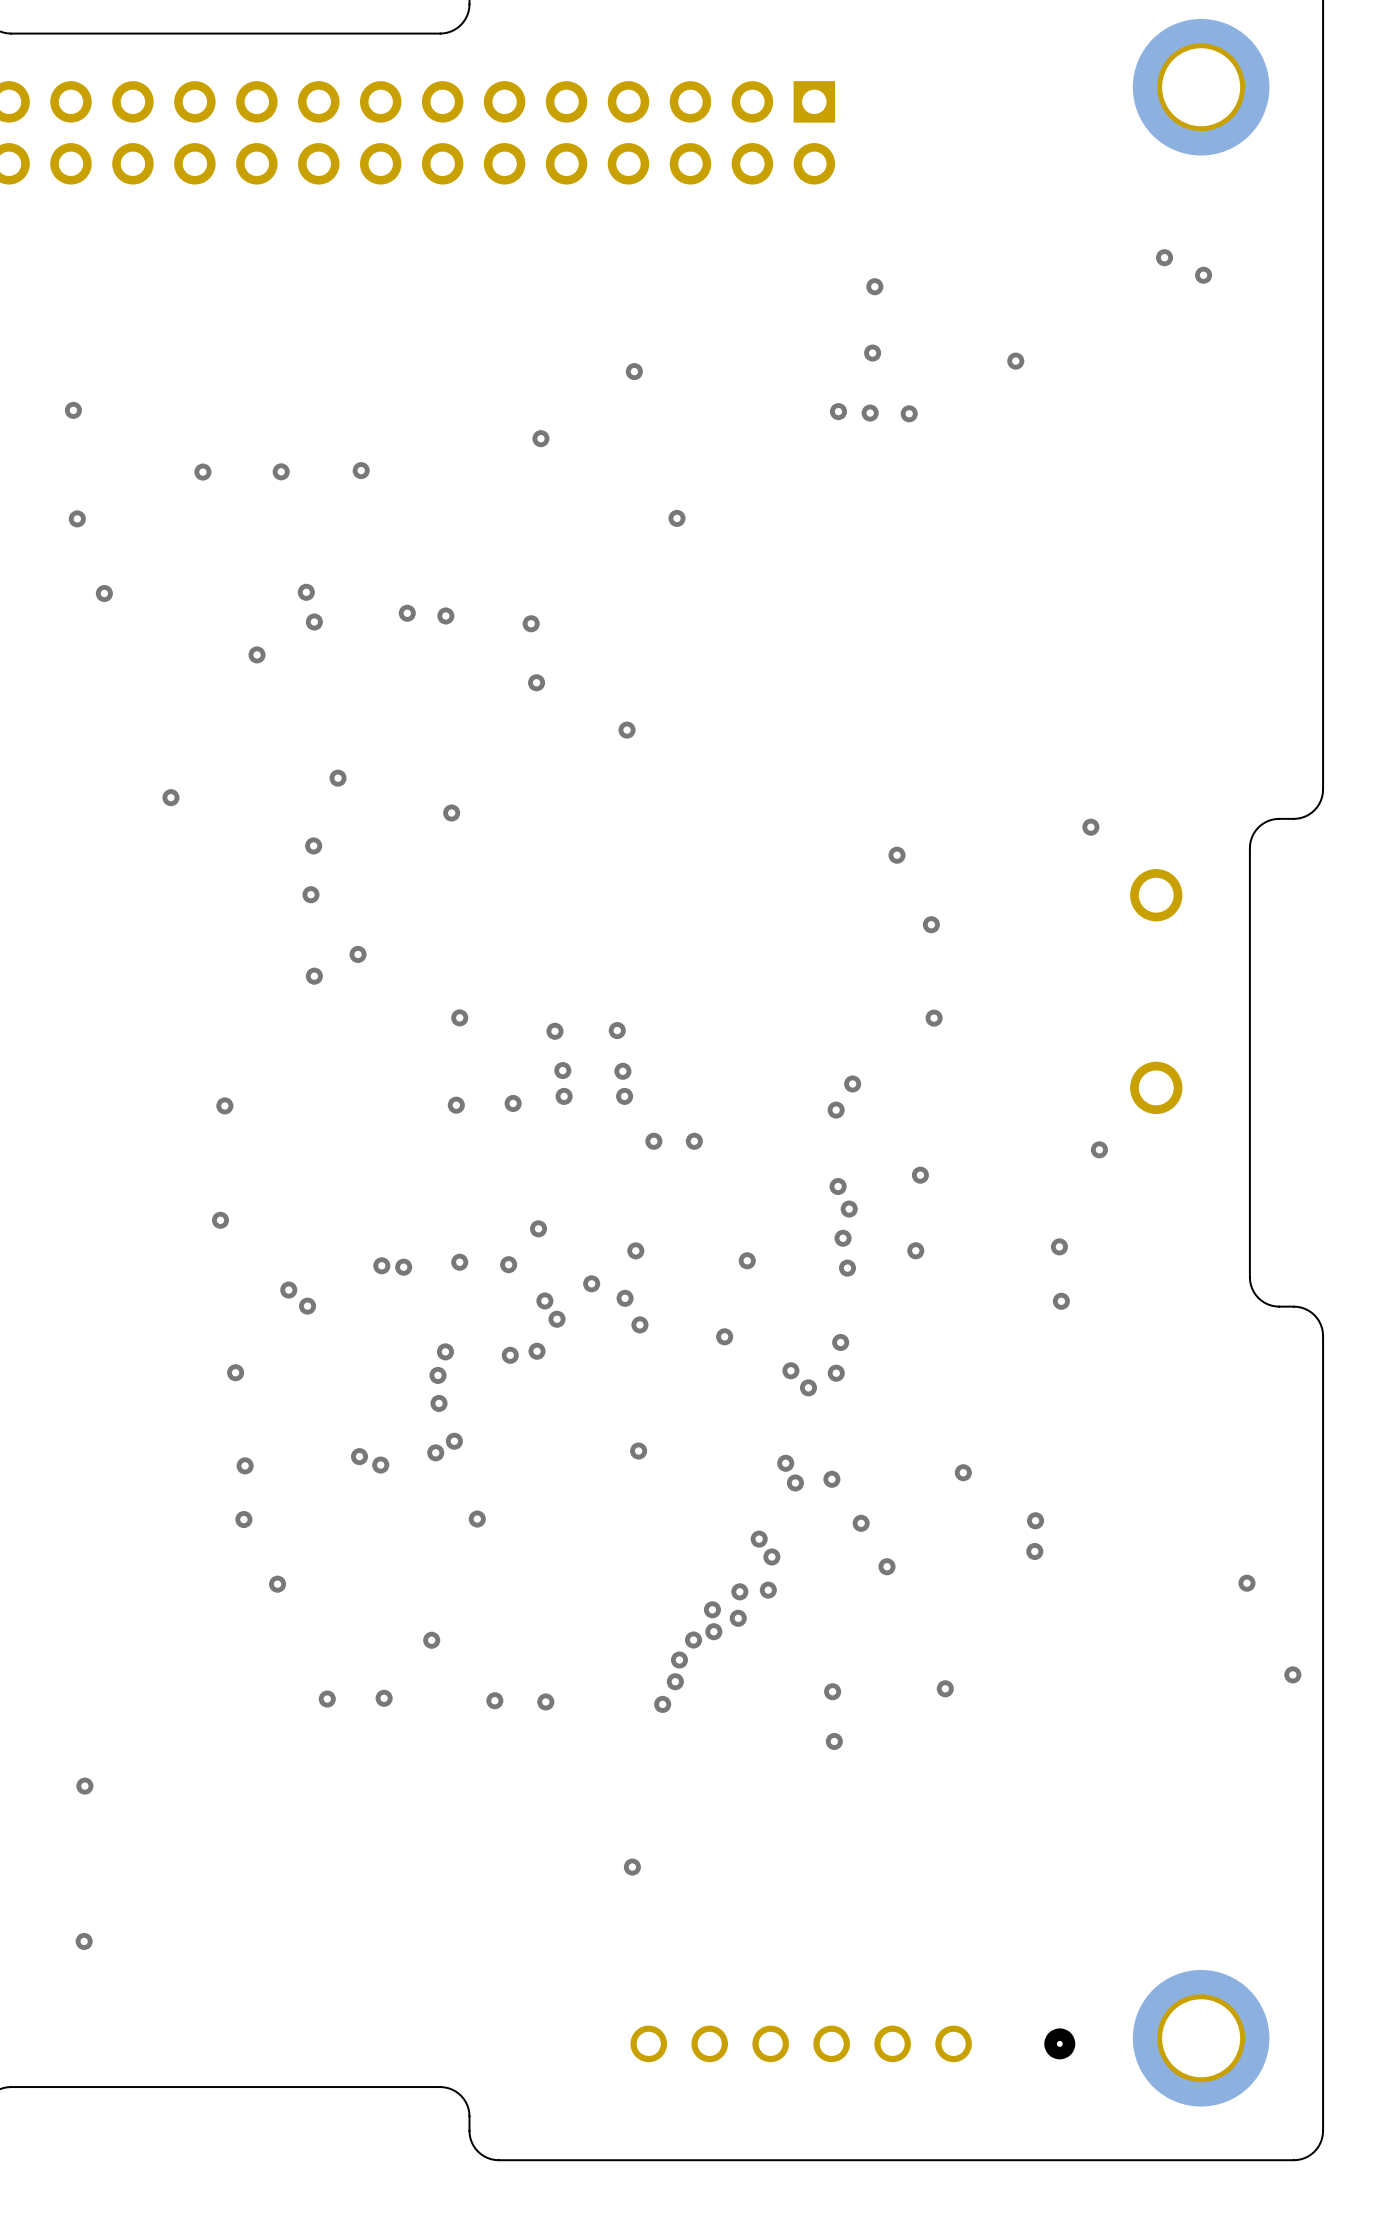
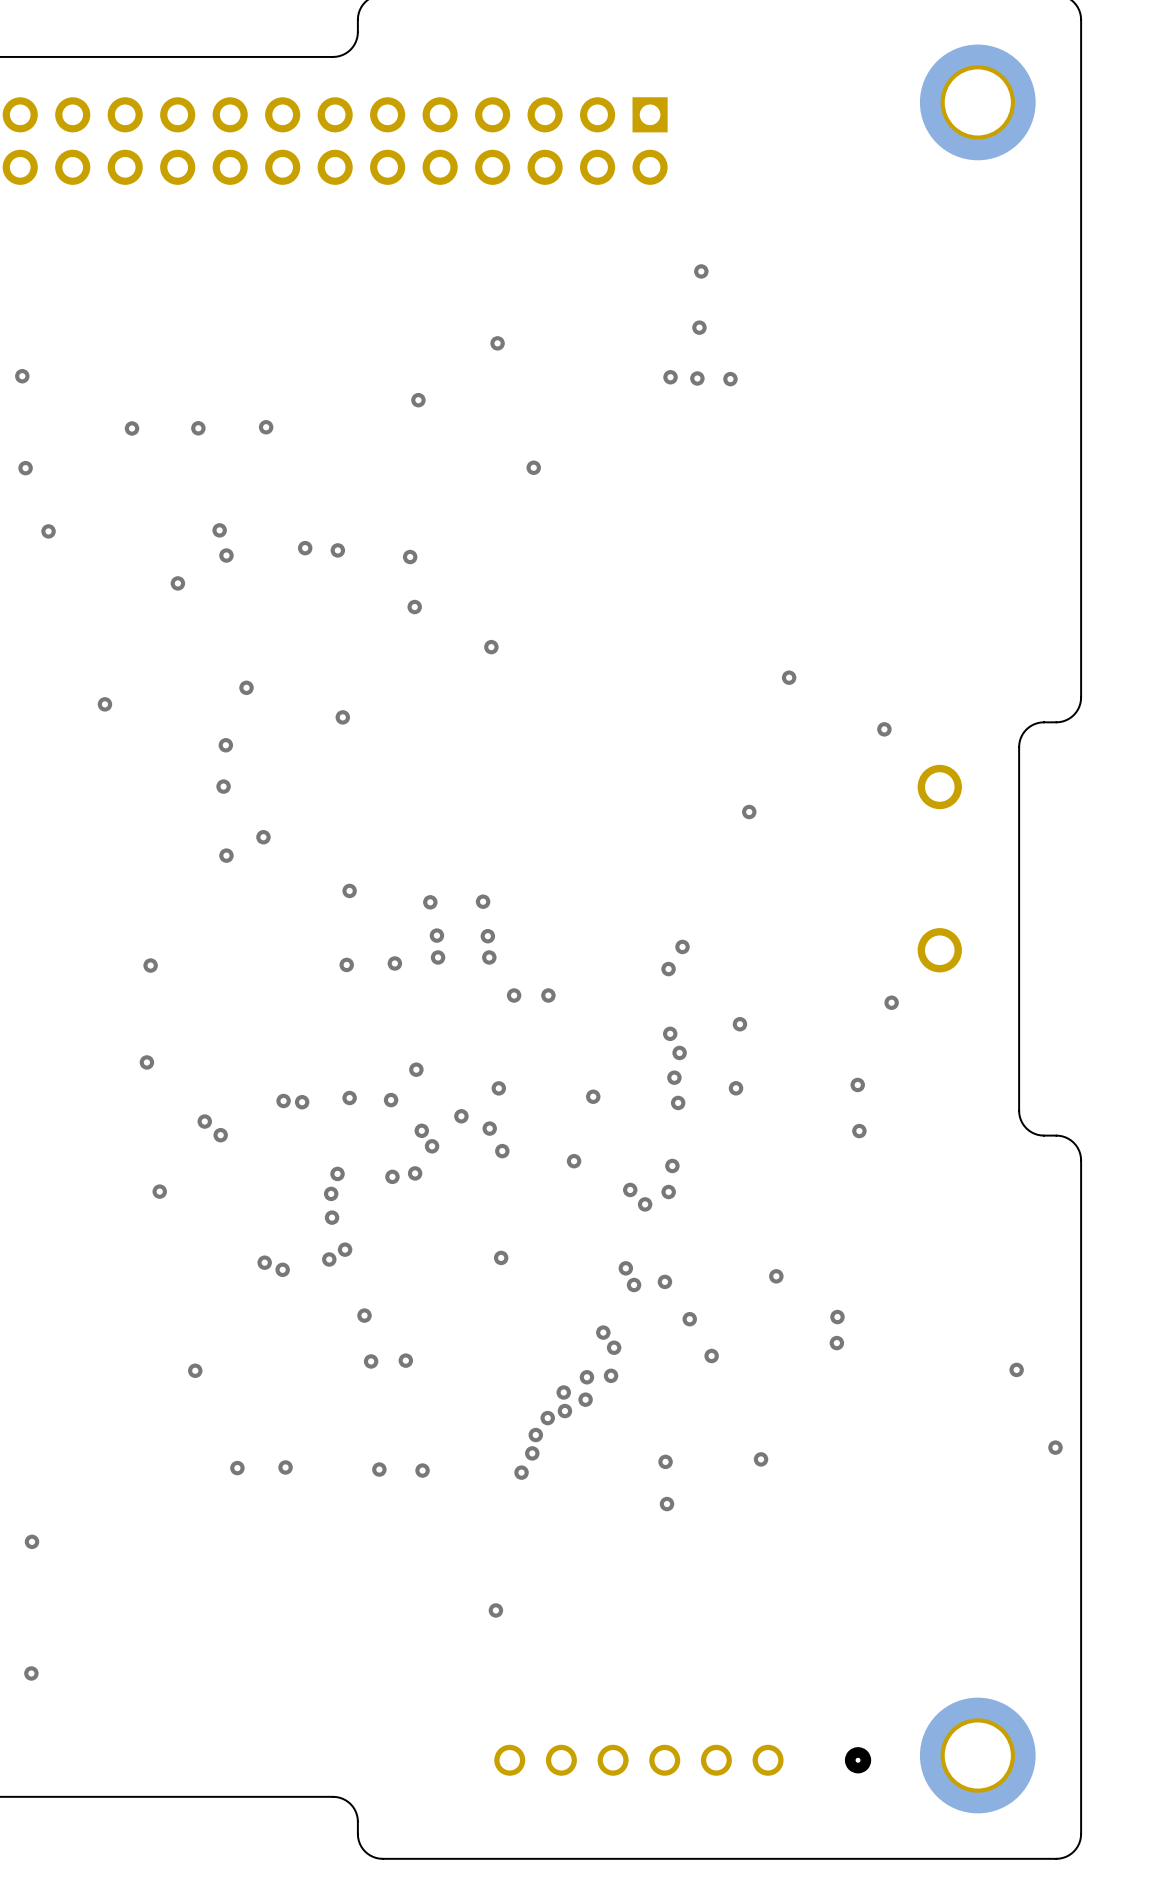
via: (1164, 257) -> none
via: (1203, 275) -> none
via: (1015, 361) -> none
via position: (897, 855) -> (789, 677)
via: (934, 1018) -> none
via: (245, 1465) -> none
via: (243, 1519) -> none
via: none -> (405, 1360)
via: none -> (371, 1361)
via: (431, 1640) -> none

